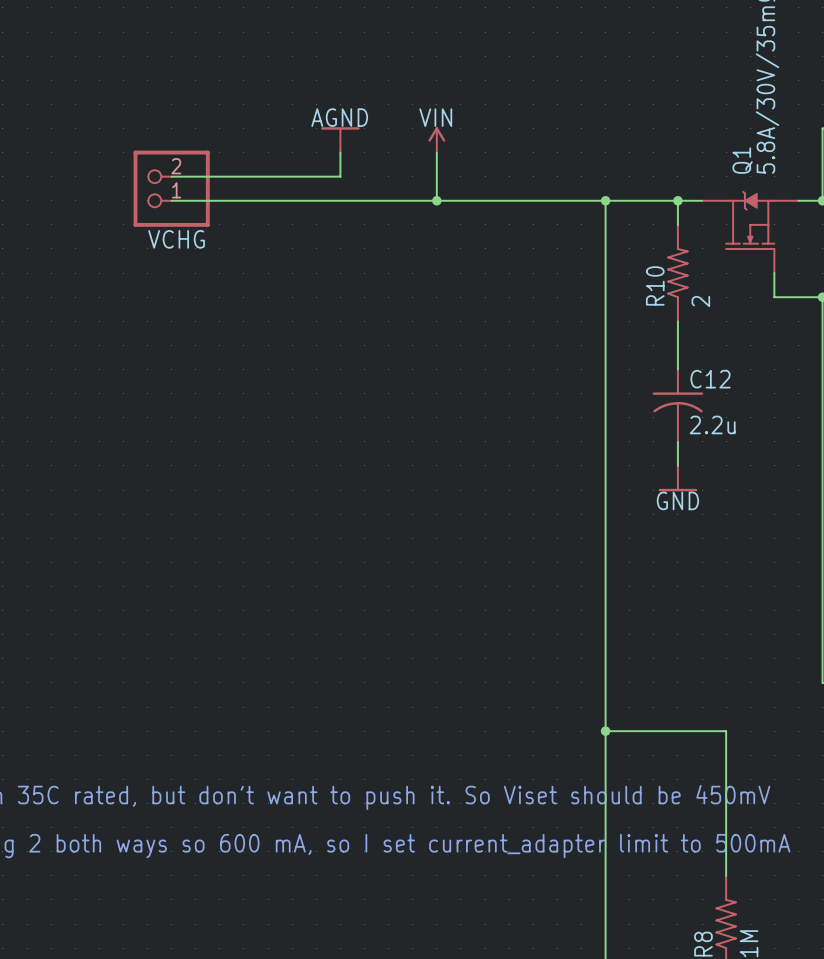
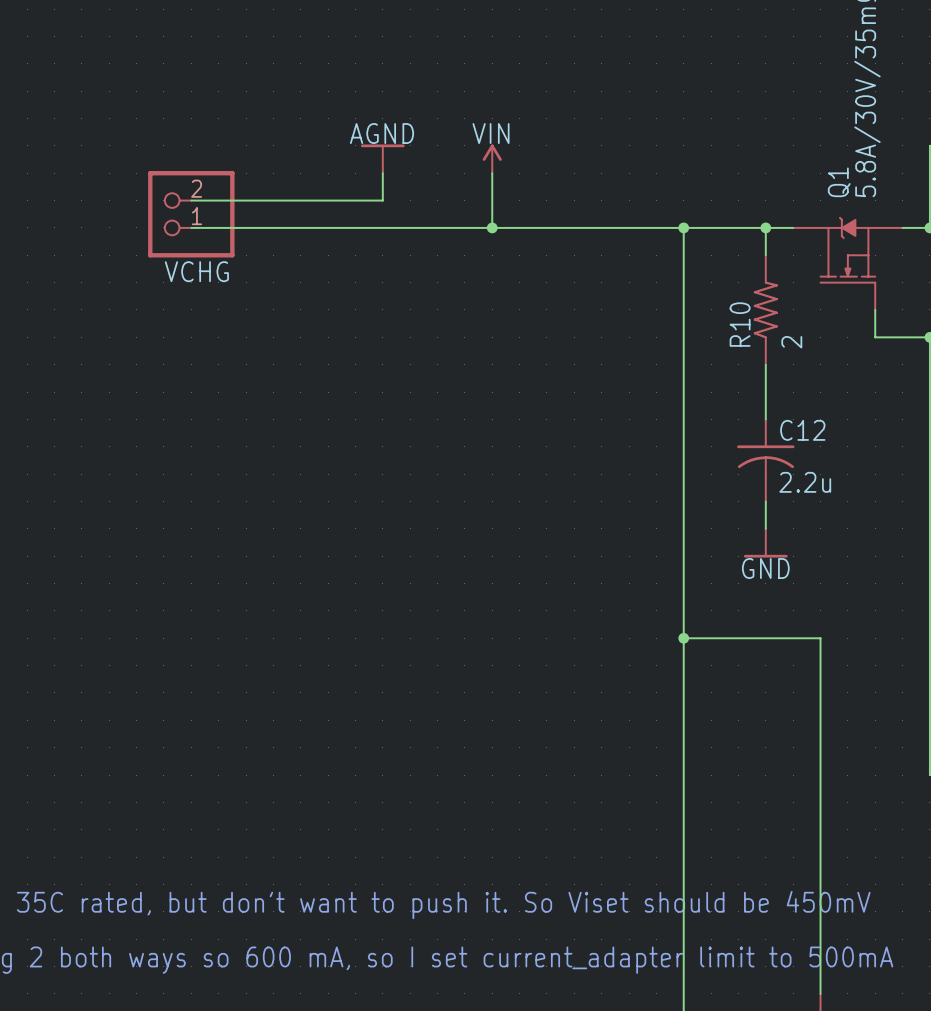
junction: none -> (683, 638)
wire: (605, 731) (726, 731) -> (683, 638) (820, 638) (820, 829)
junction: (605, 731) -> none

